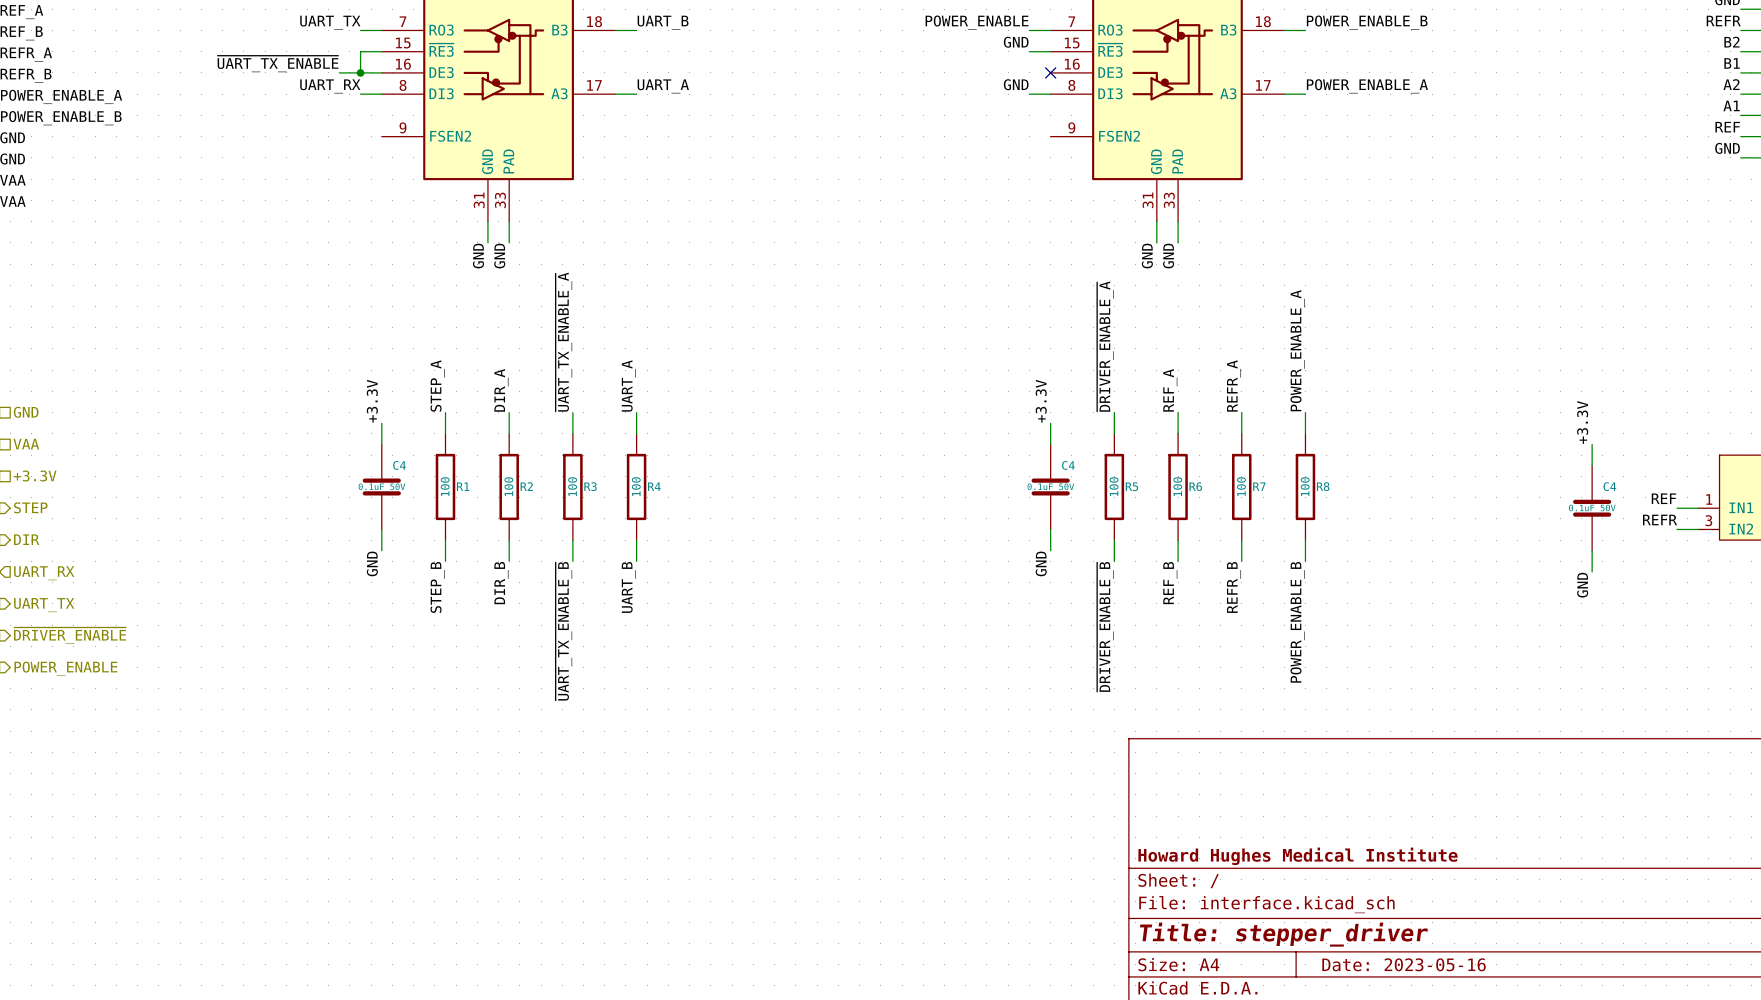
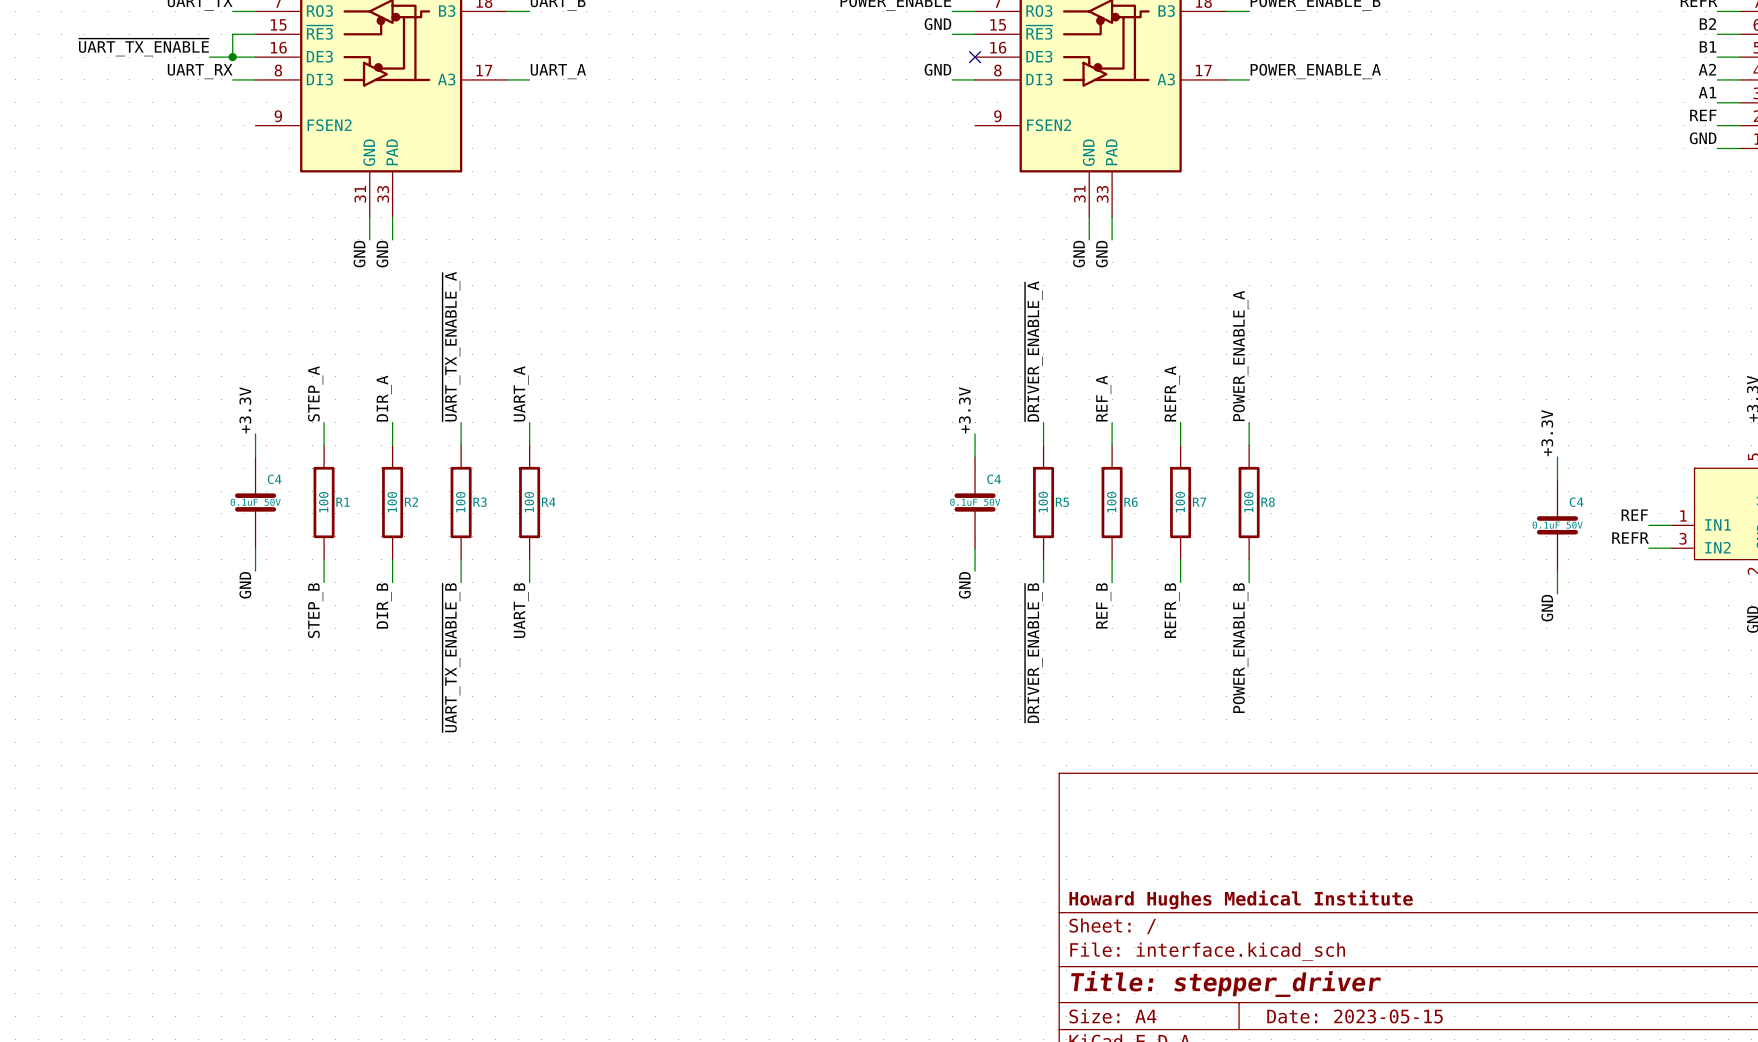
title block: Date: 2023-05-16 (1404, 964) -> Date: 2023-05-15 (1355, 1016)

